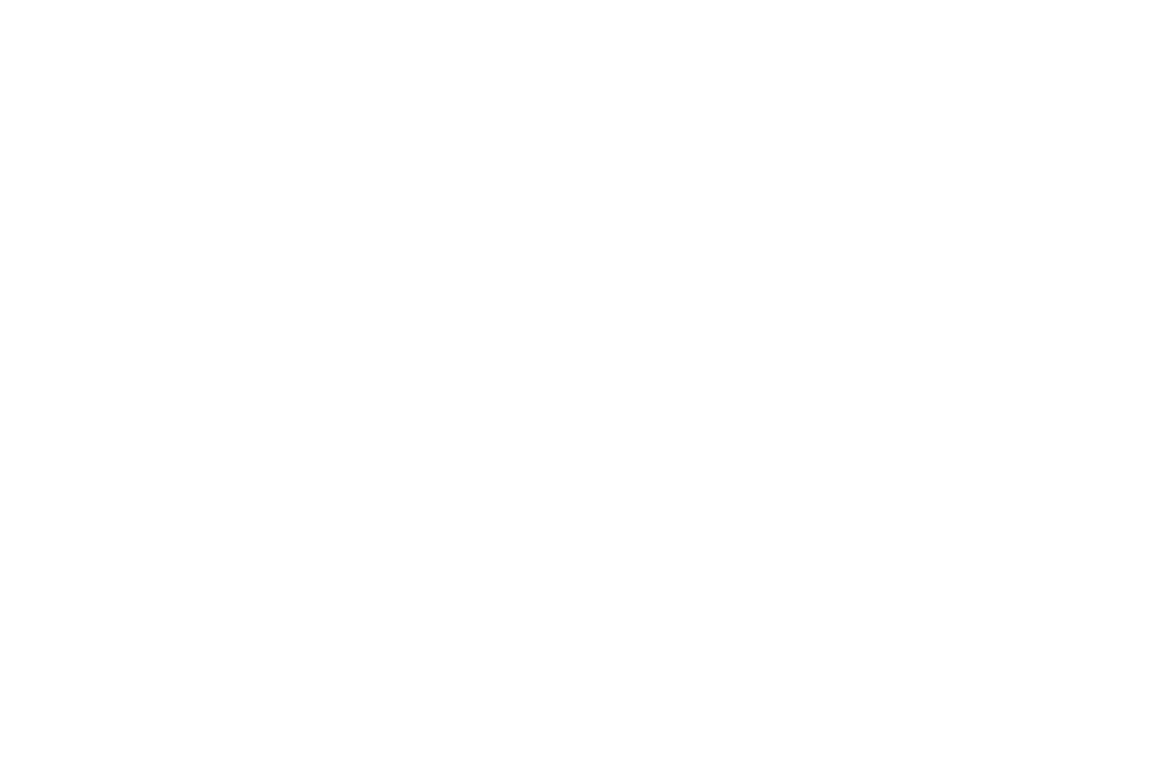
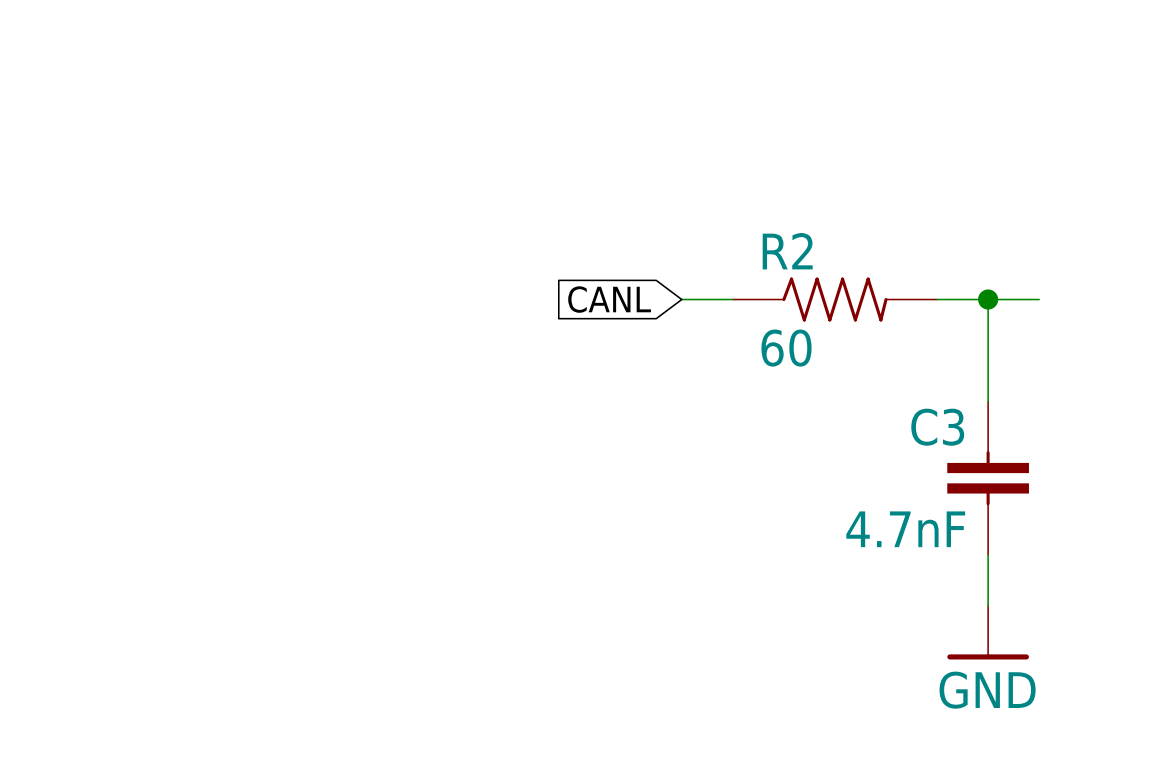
global label: none -> CANL (609, 299)
wire: none -> (681, 299) (732, 299)
R2: none -> 60 (834, 299)
wire: none -> (937, 299) (1039, 299)
wire: none -> (988, 299) (988, 401)
junction: none -> (988, 299)
C3: none -> 4.7nF (988, 478)
wire: none -> (988, 554) (988, 605)
power symbol: none -> GND (988, 632)

